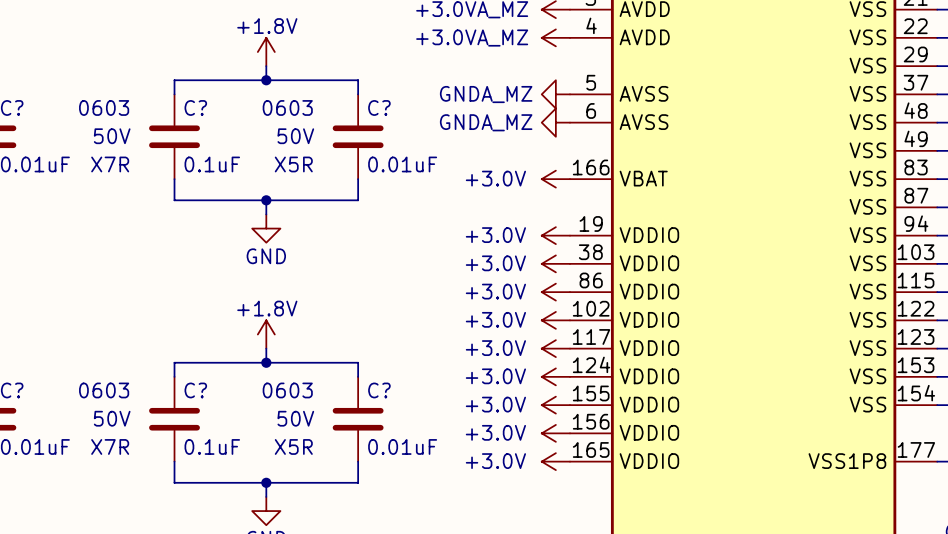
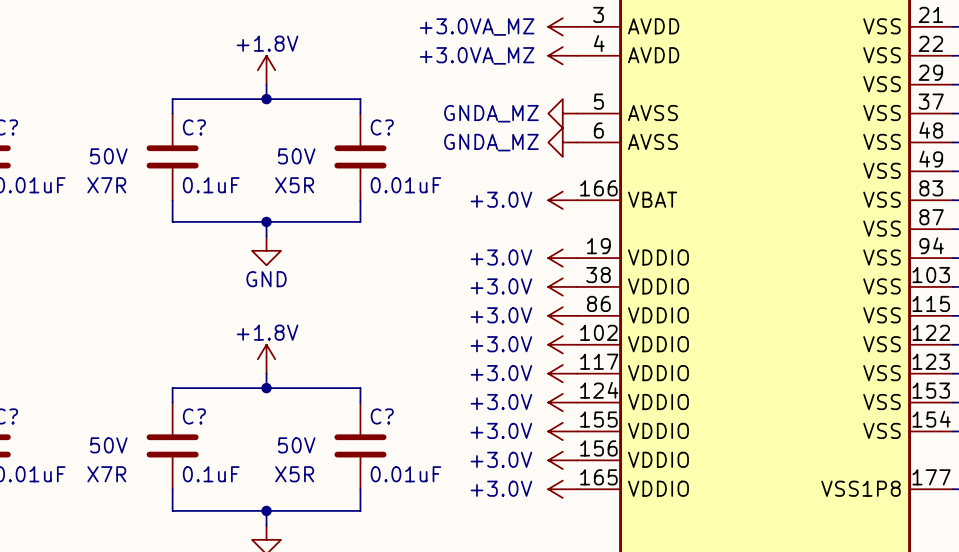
C? text: 0603 (104, 107) -> none
C? text: 0603 (287, 107) -> none
C? text: 0603 (104, 390) -> none
C? text: 0603 (287, 390) -> none

